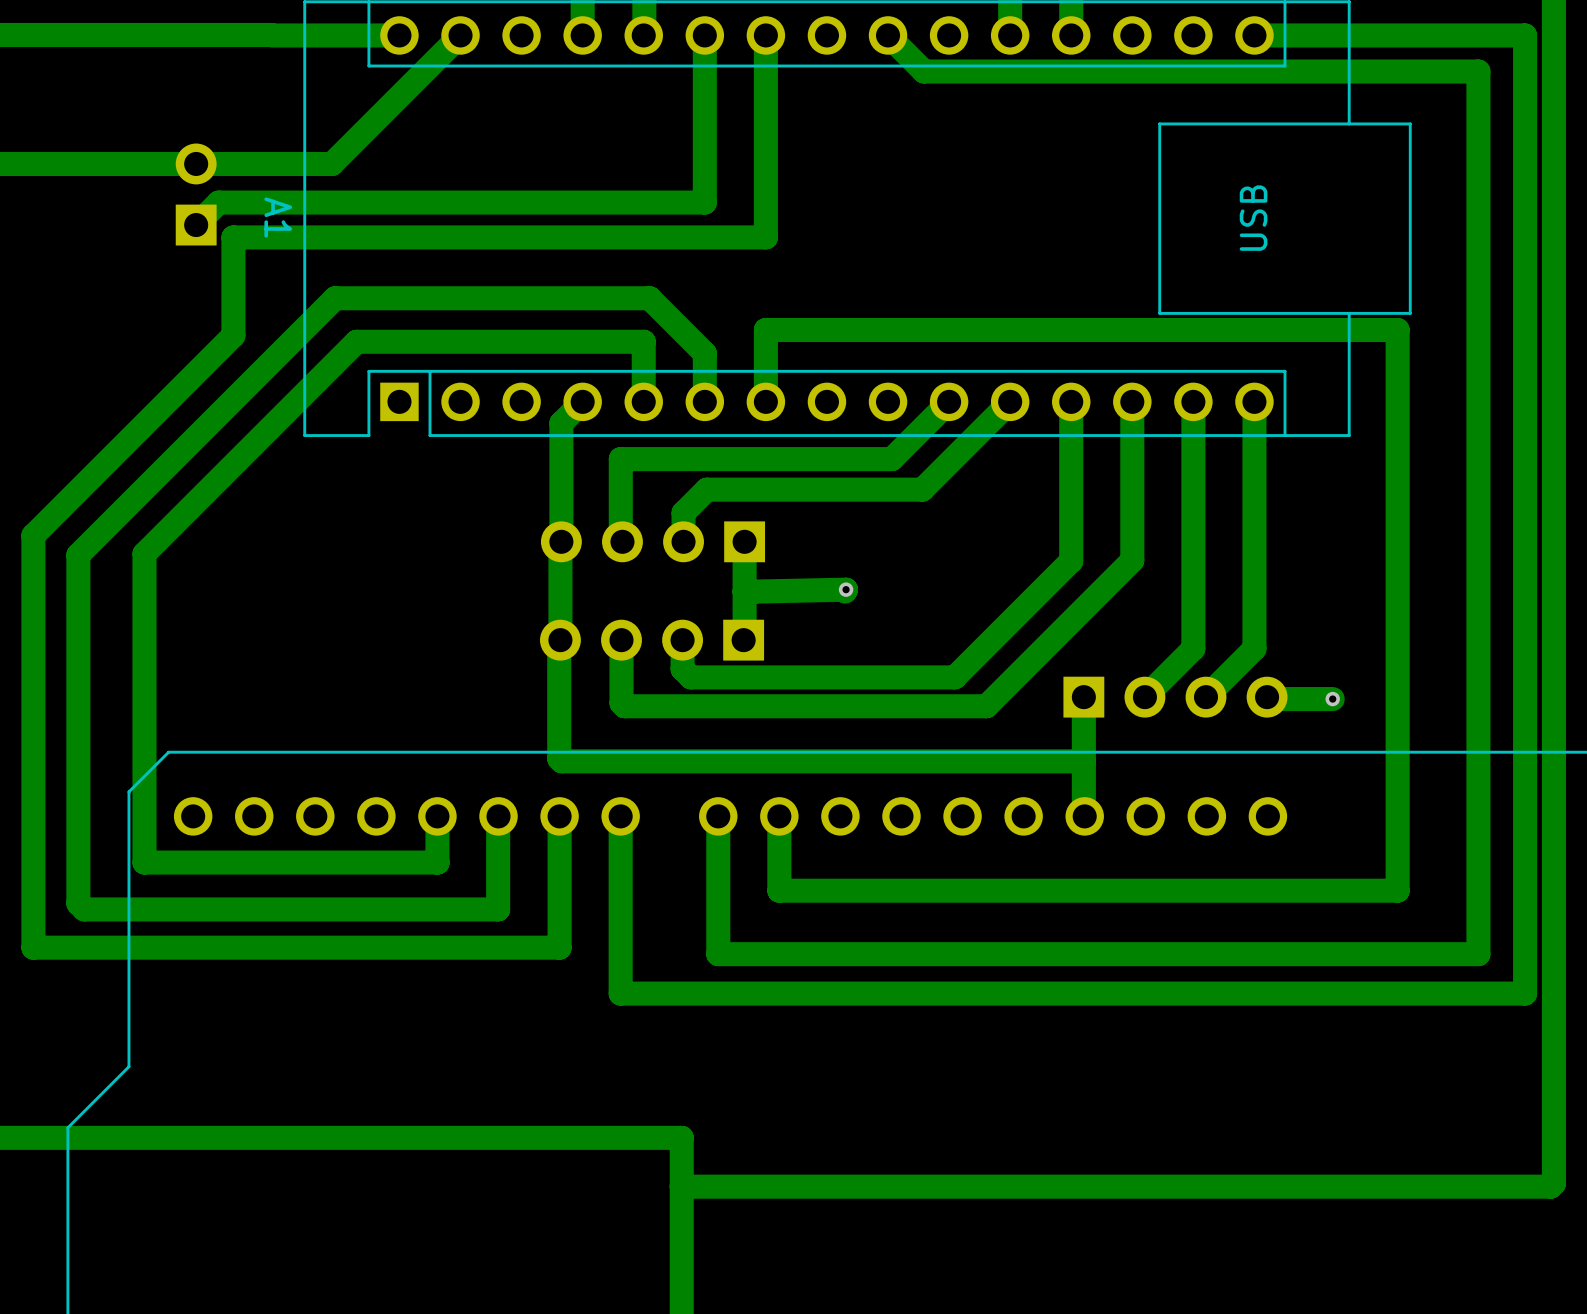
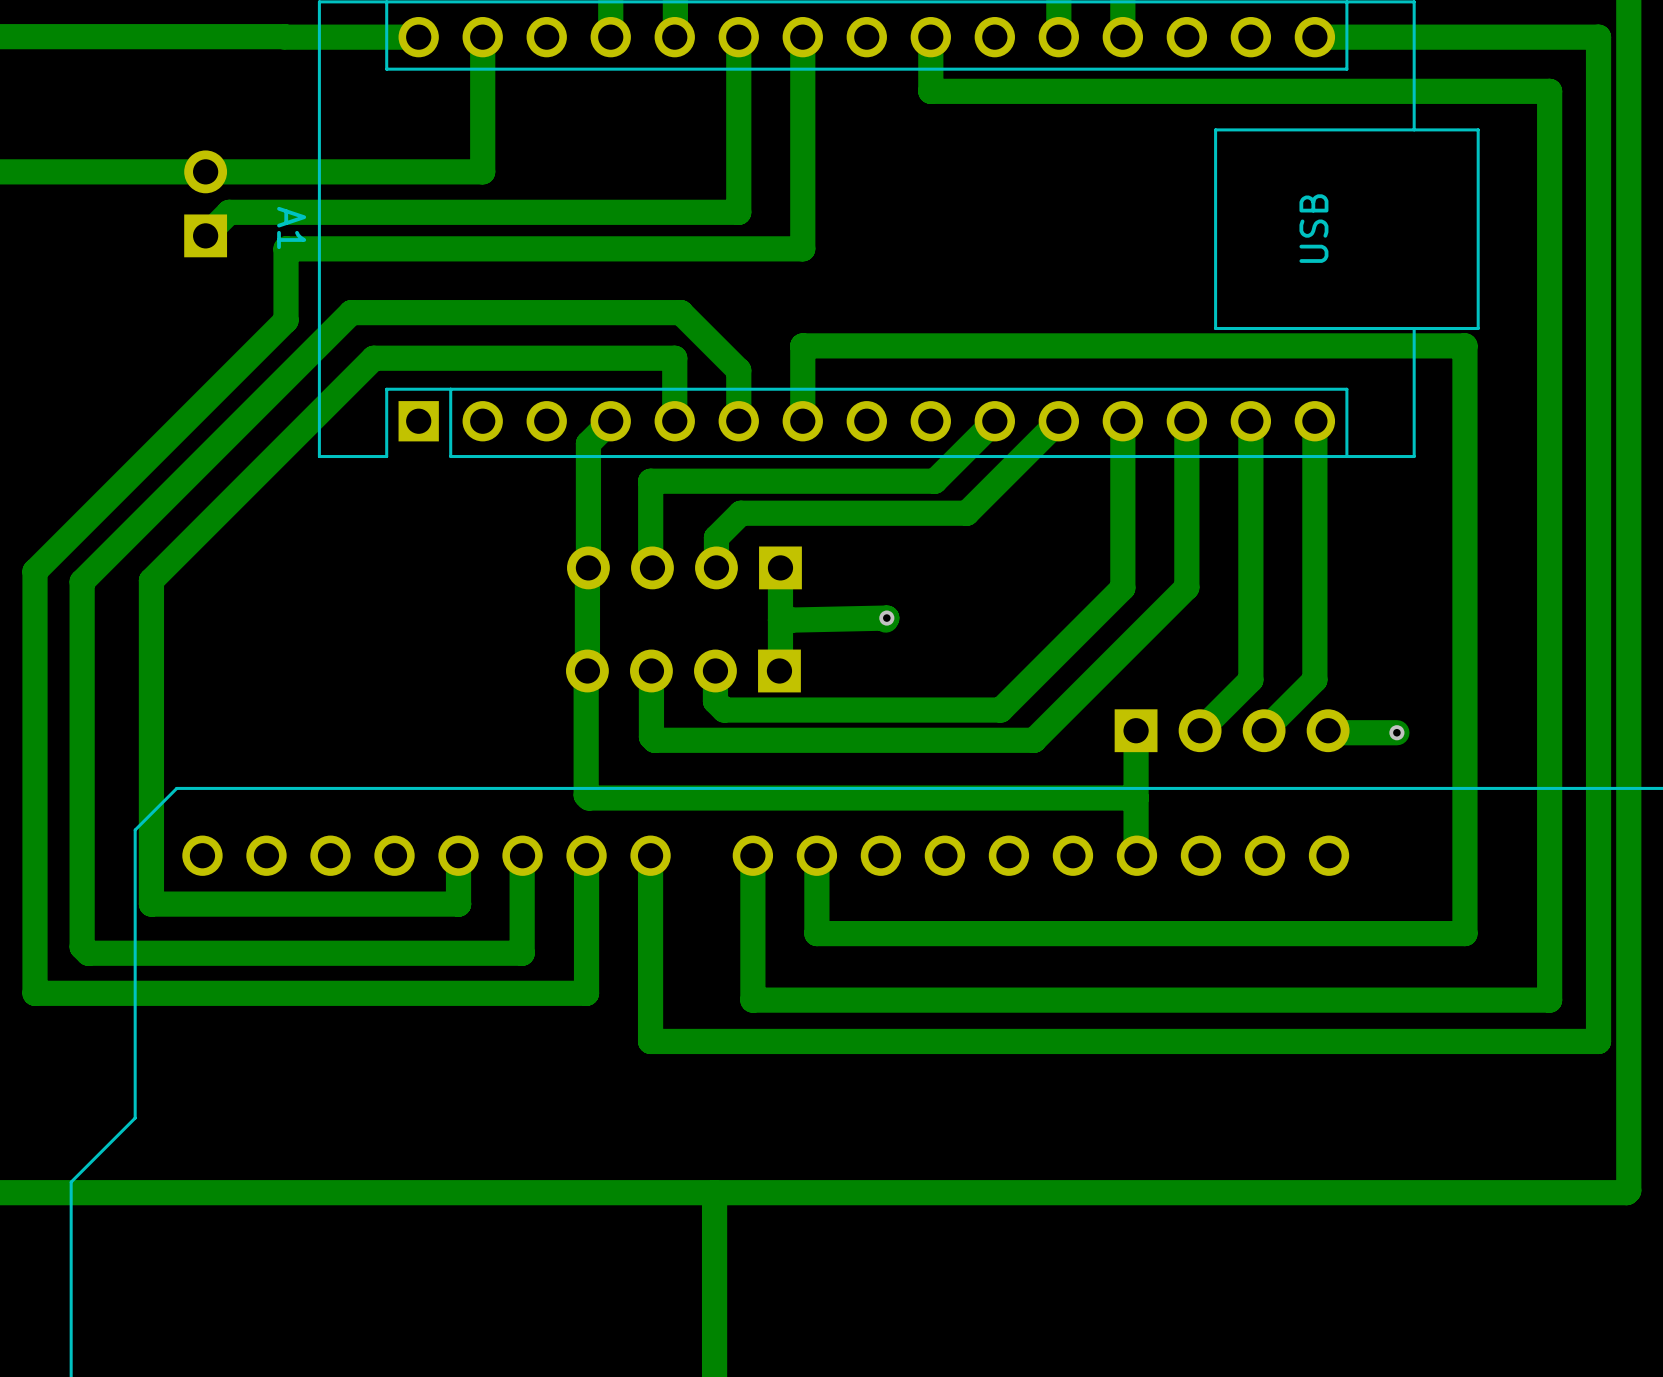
track: (460, 35) (332, 163) -> (482, 37) (482, 171) (348, 171)
track: (888, 35) (924, 71) (1478, 71) (1478, 87) -> (930, 37) (930, 91) (1549, 91)
track: (272, 237) (233, 237) (233, 335) (33, 535) (33, 545) -> (286, 248) (286, 320) (35, 571)
track: (1553, 1135) (1553, 1183) (1550, 1186) (681, 1186) -> (1628, 1190) (1626, 1192) (714, 1192)

